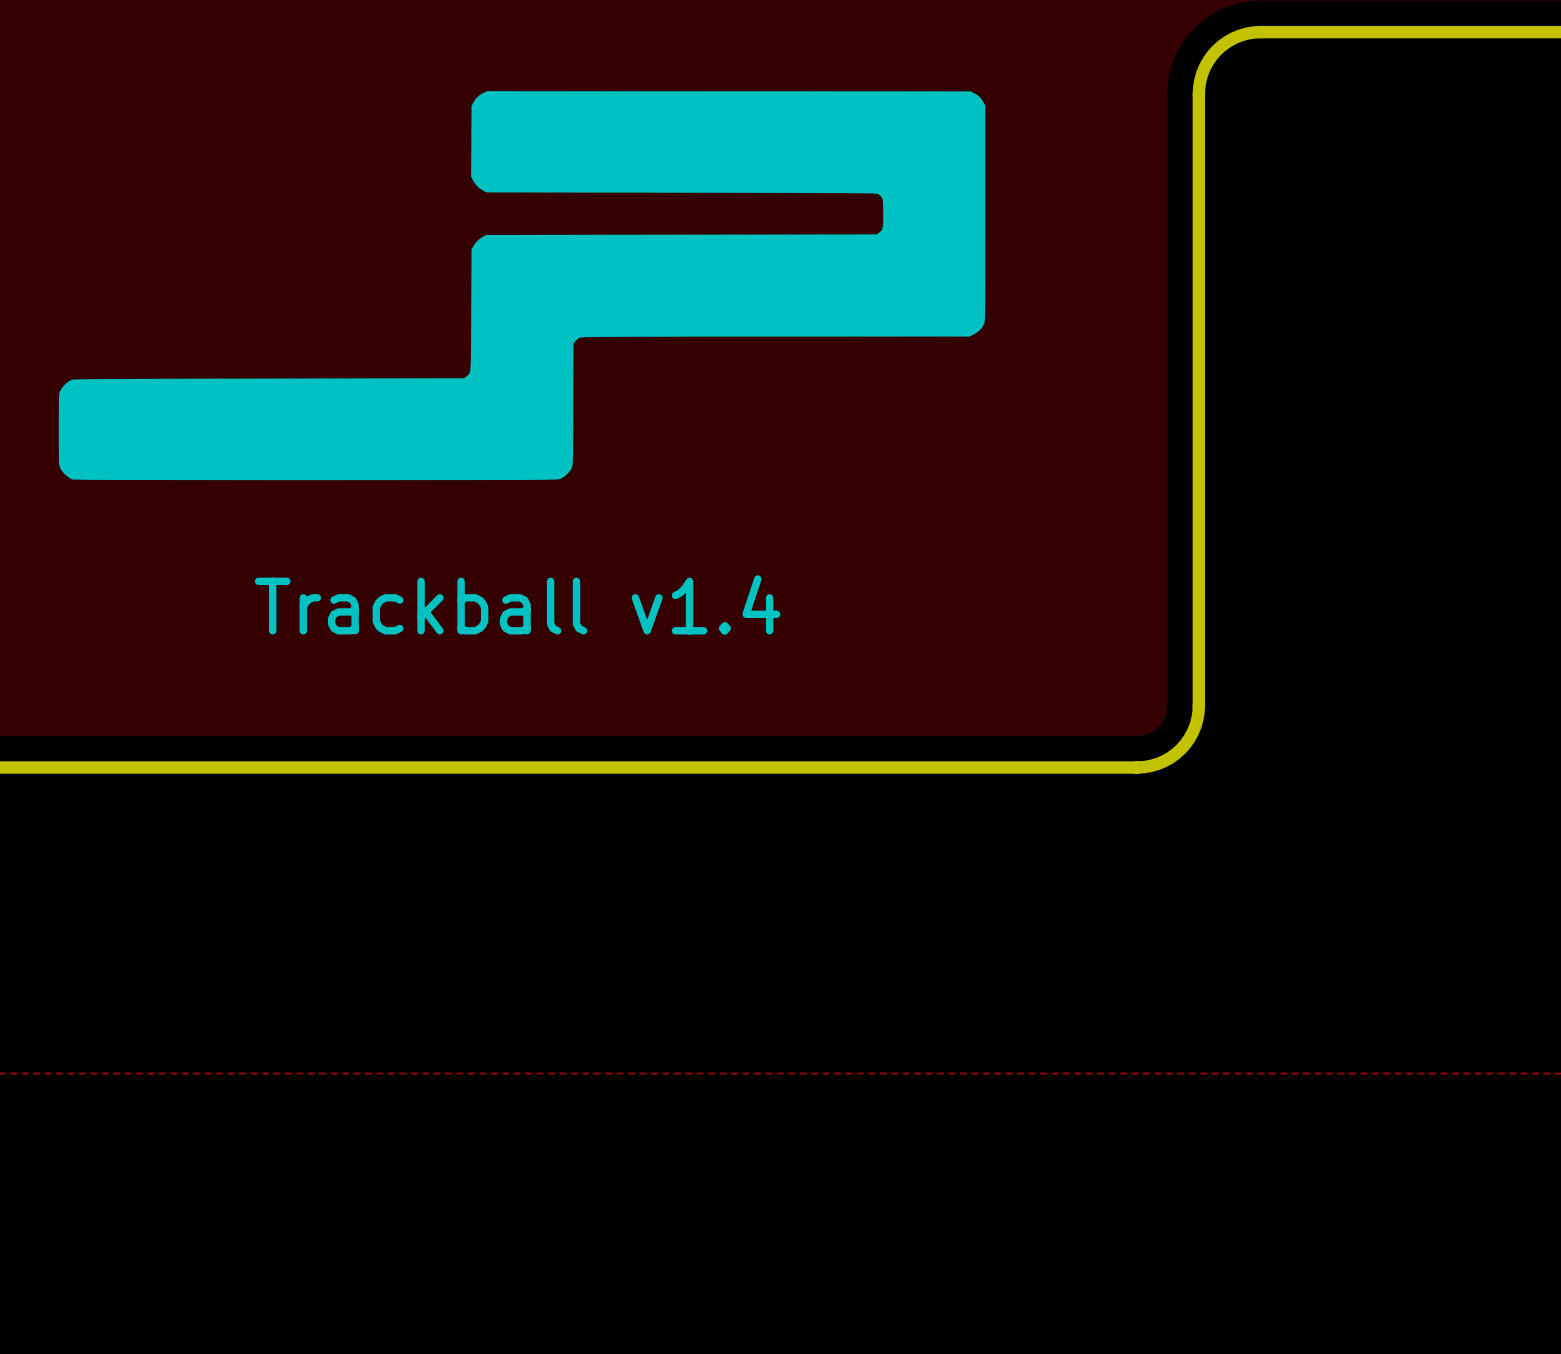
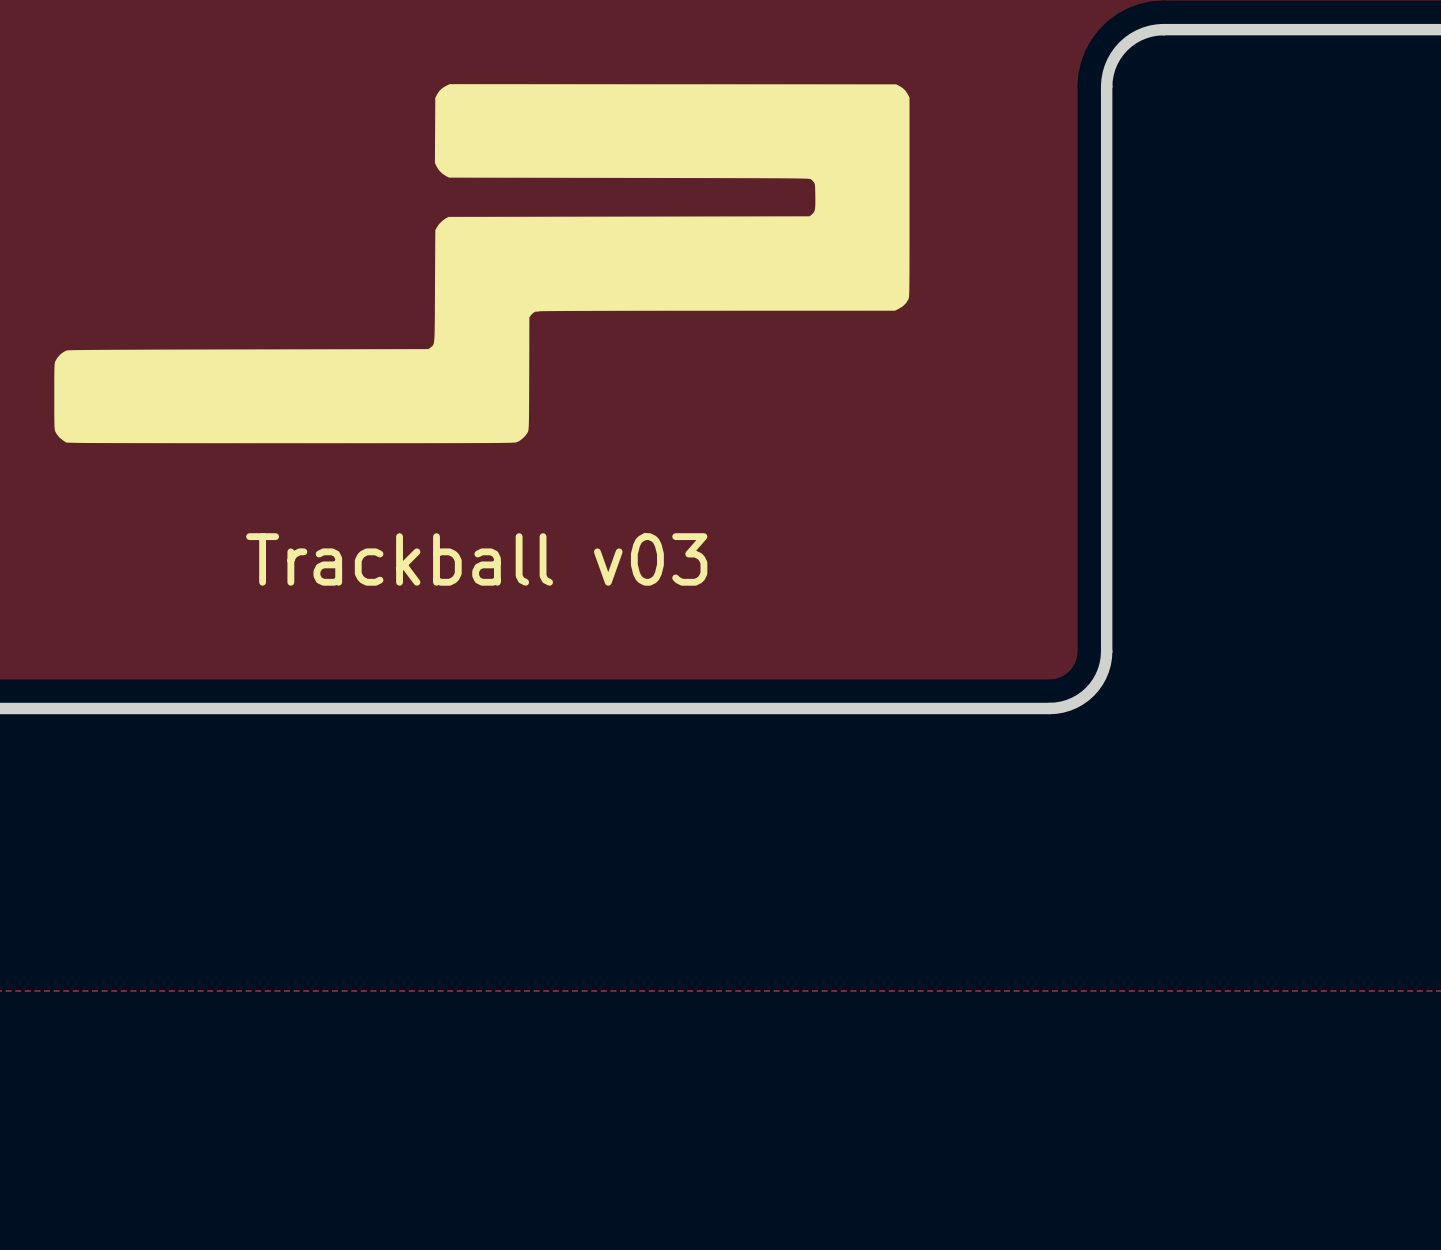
text: Trackball v1.4 (517, 604) -> Trackball v03 (476, 559)

